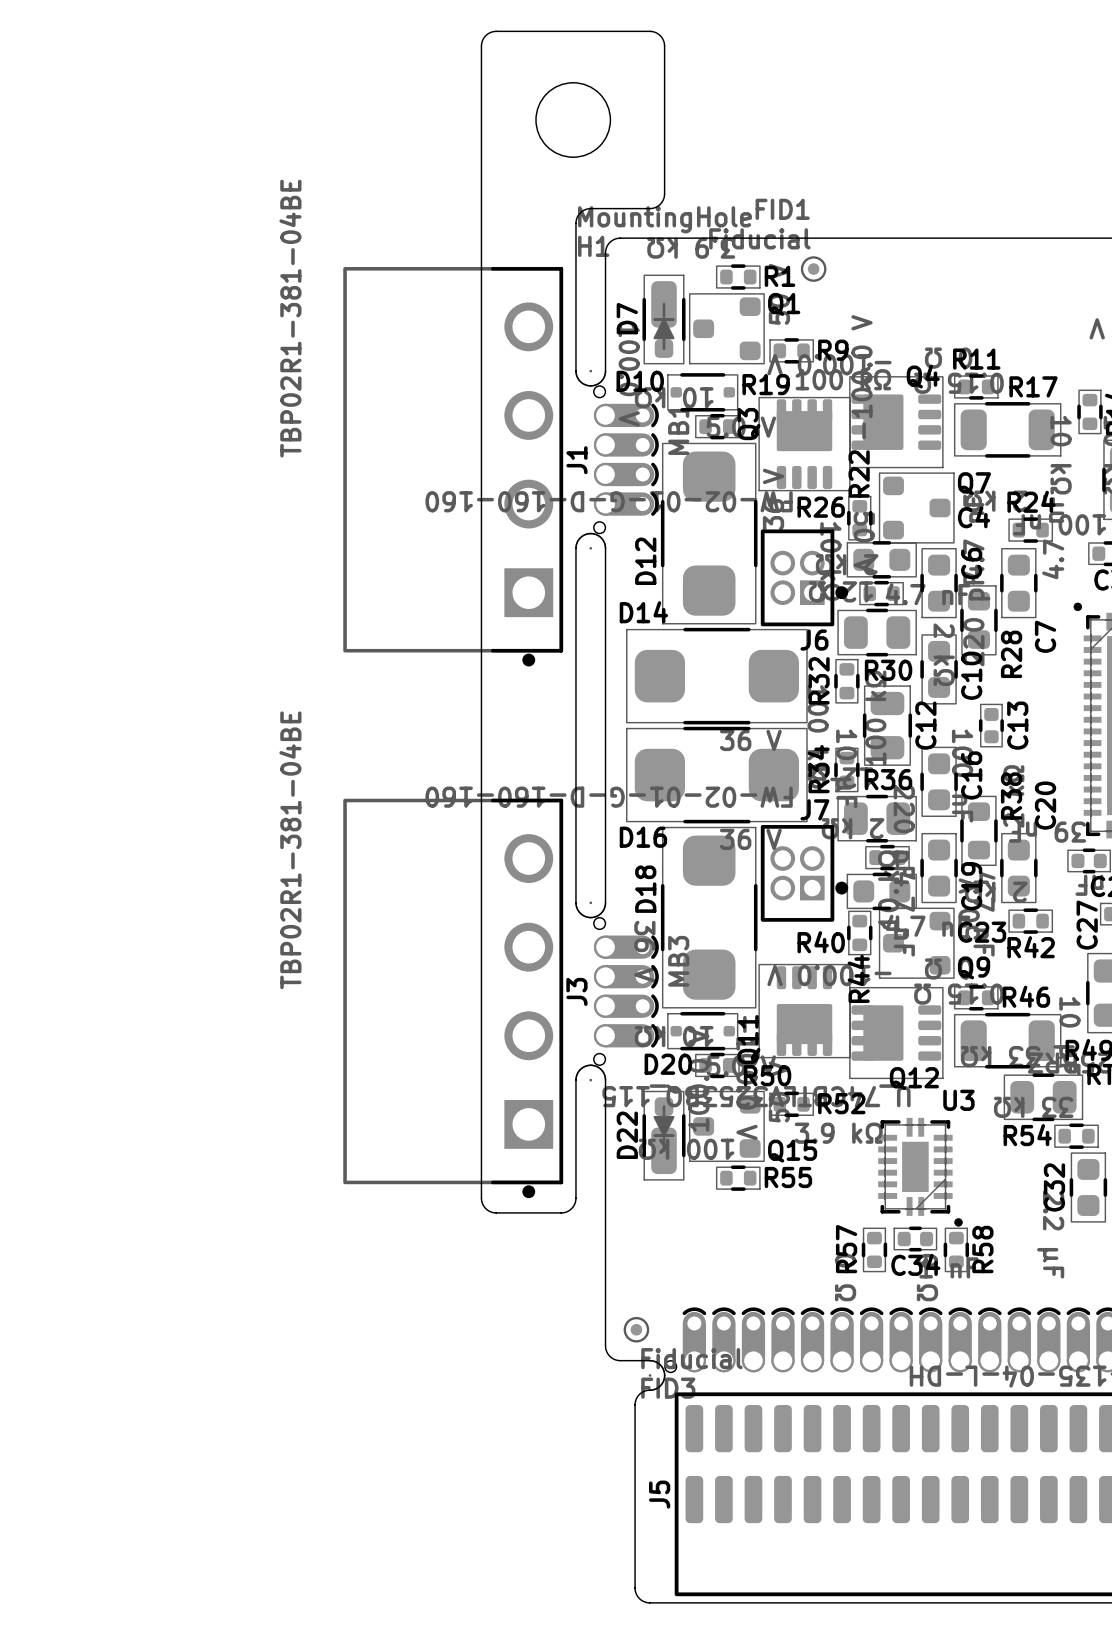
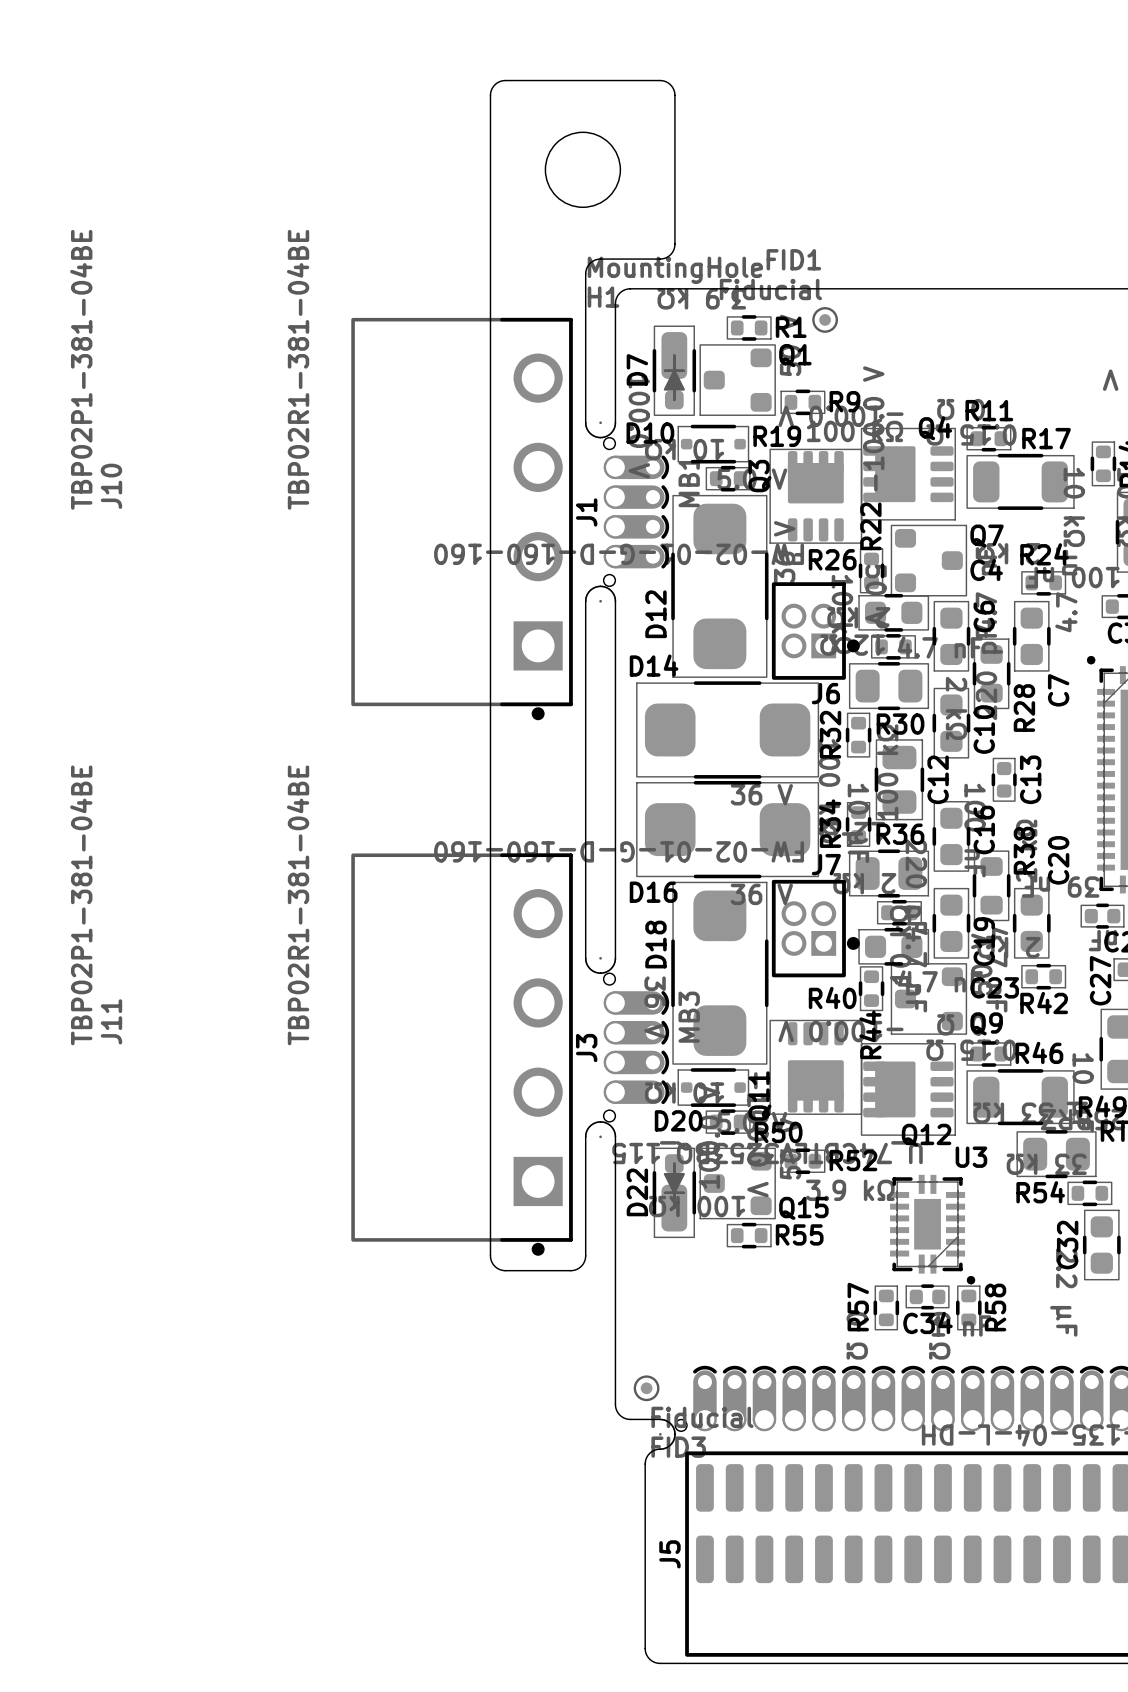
J10: none -> TBP02P1-381-04BE (96, 369)
J11: none -> TBP02P1-381-04BE (96, 905)

